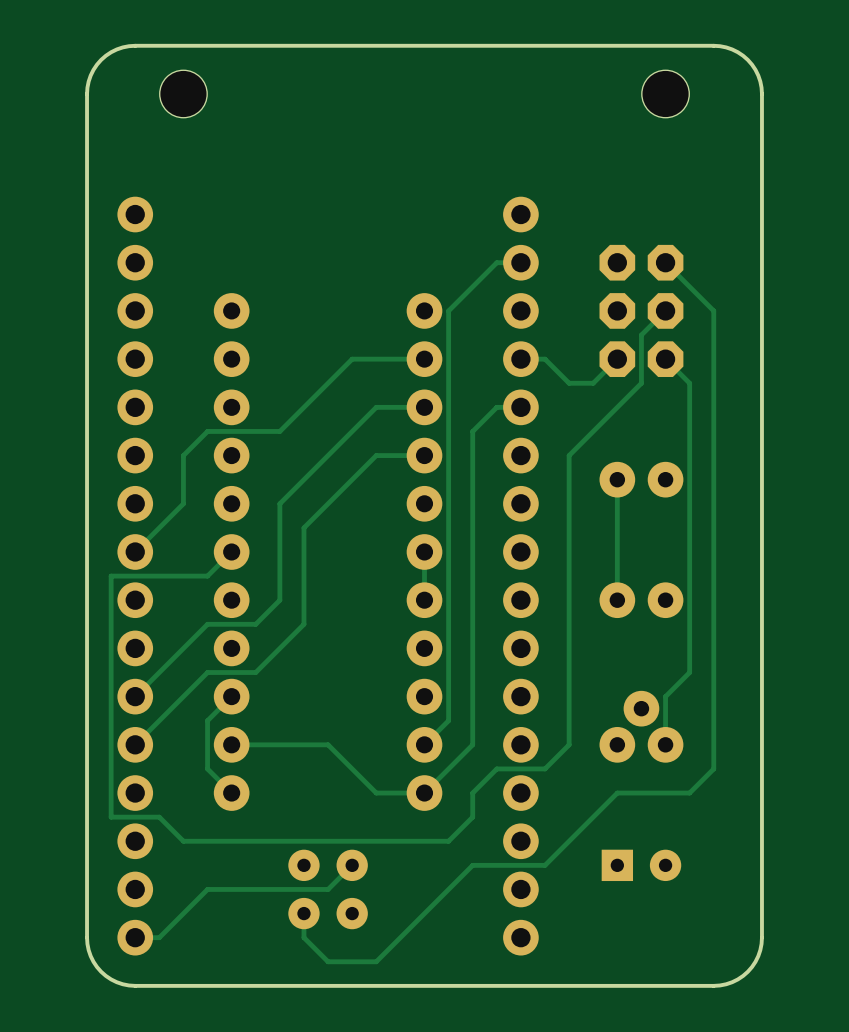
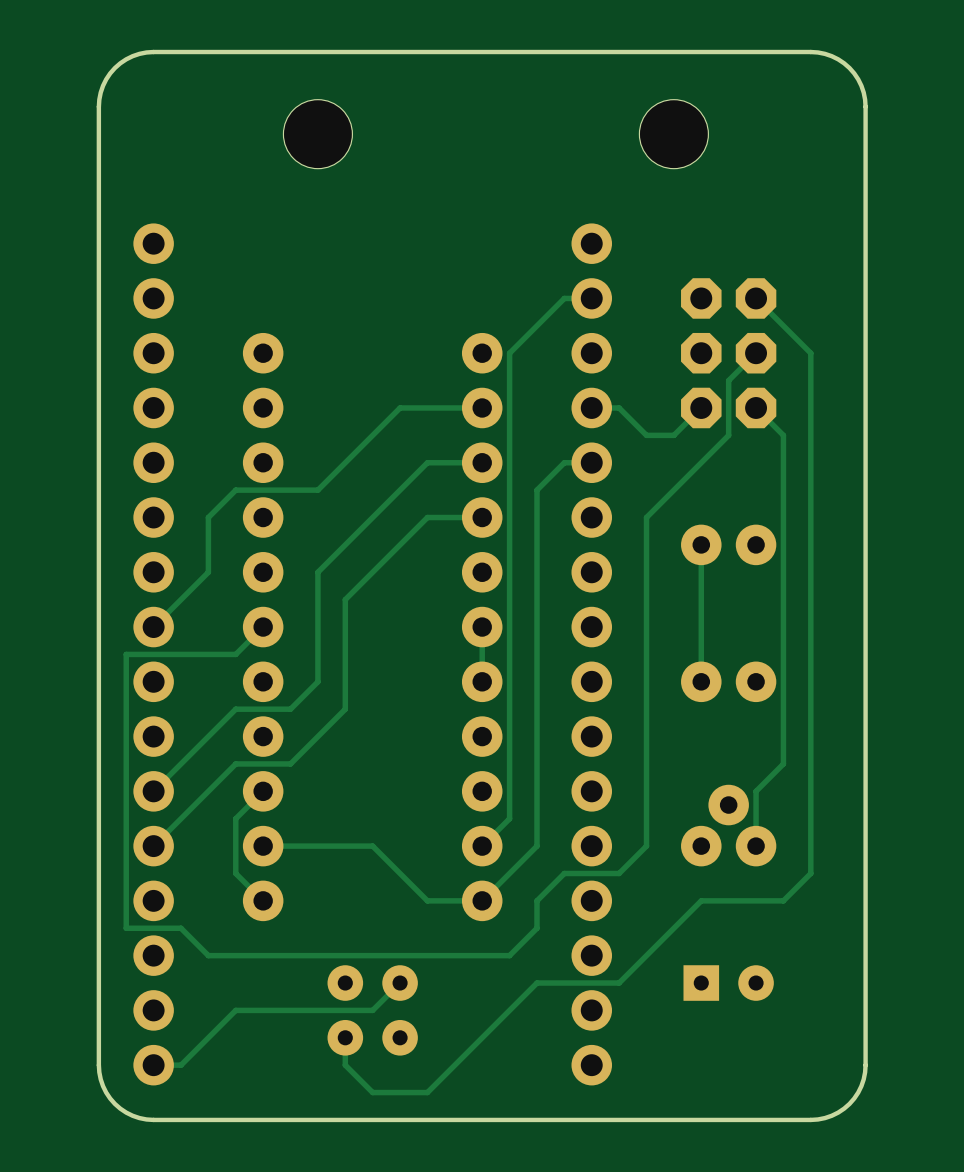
hole: (183, 93) -> none
hole: (665, 93) -> none
hole: none -> (317, 134)
hole: none -> (673, 134)

